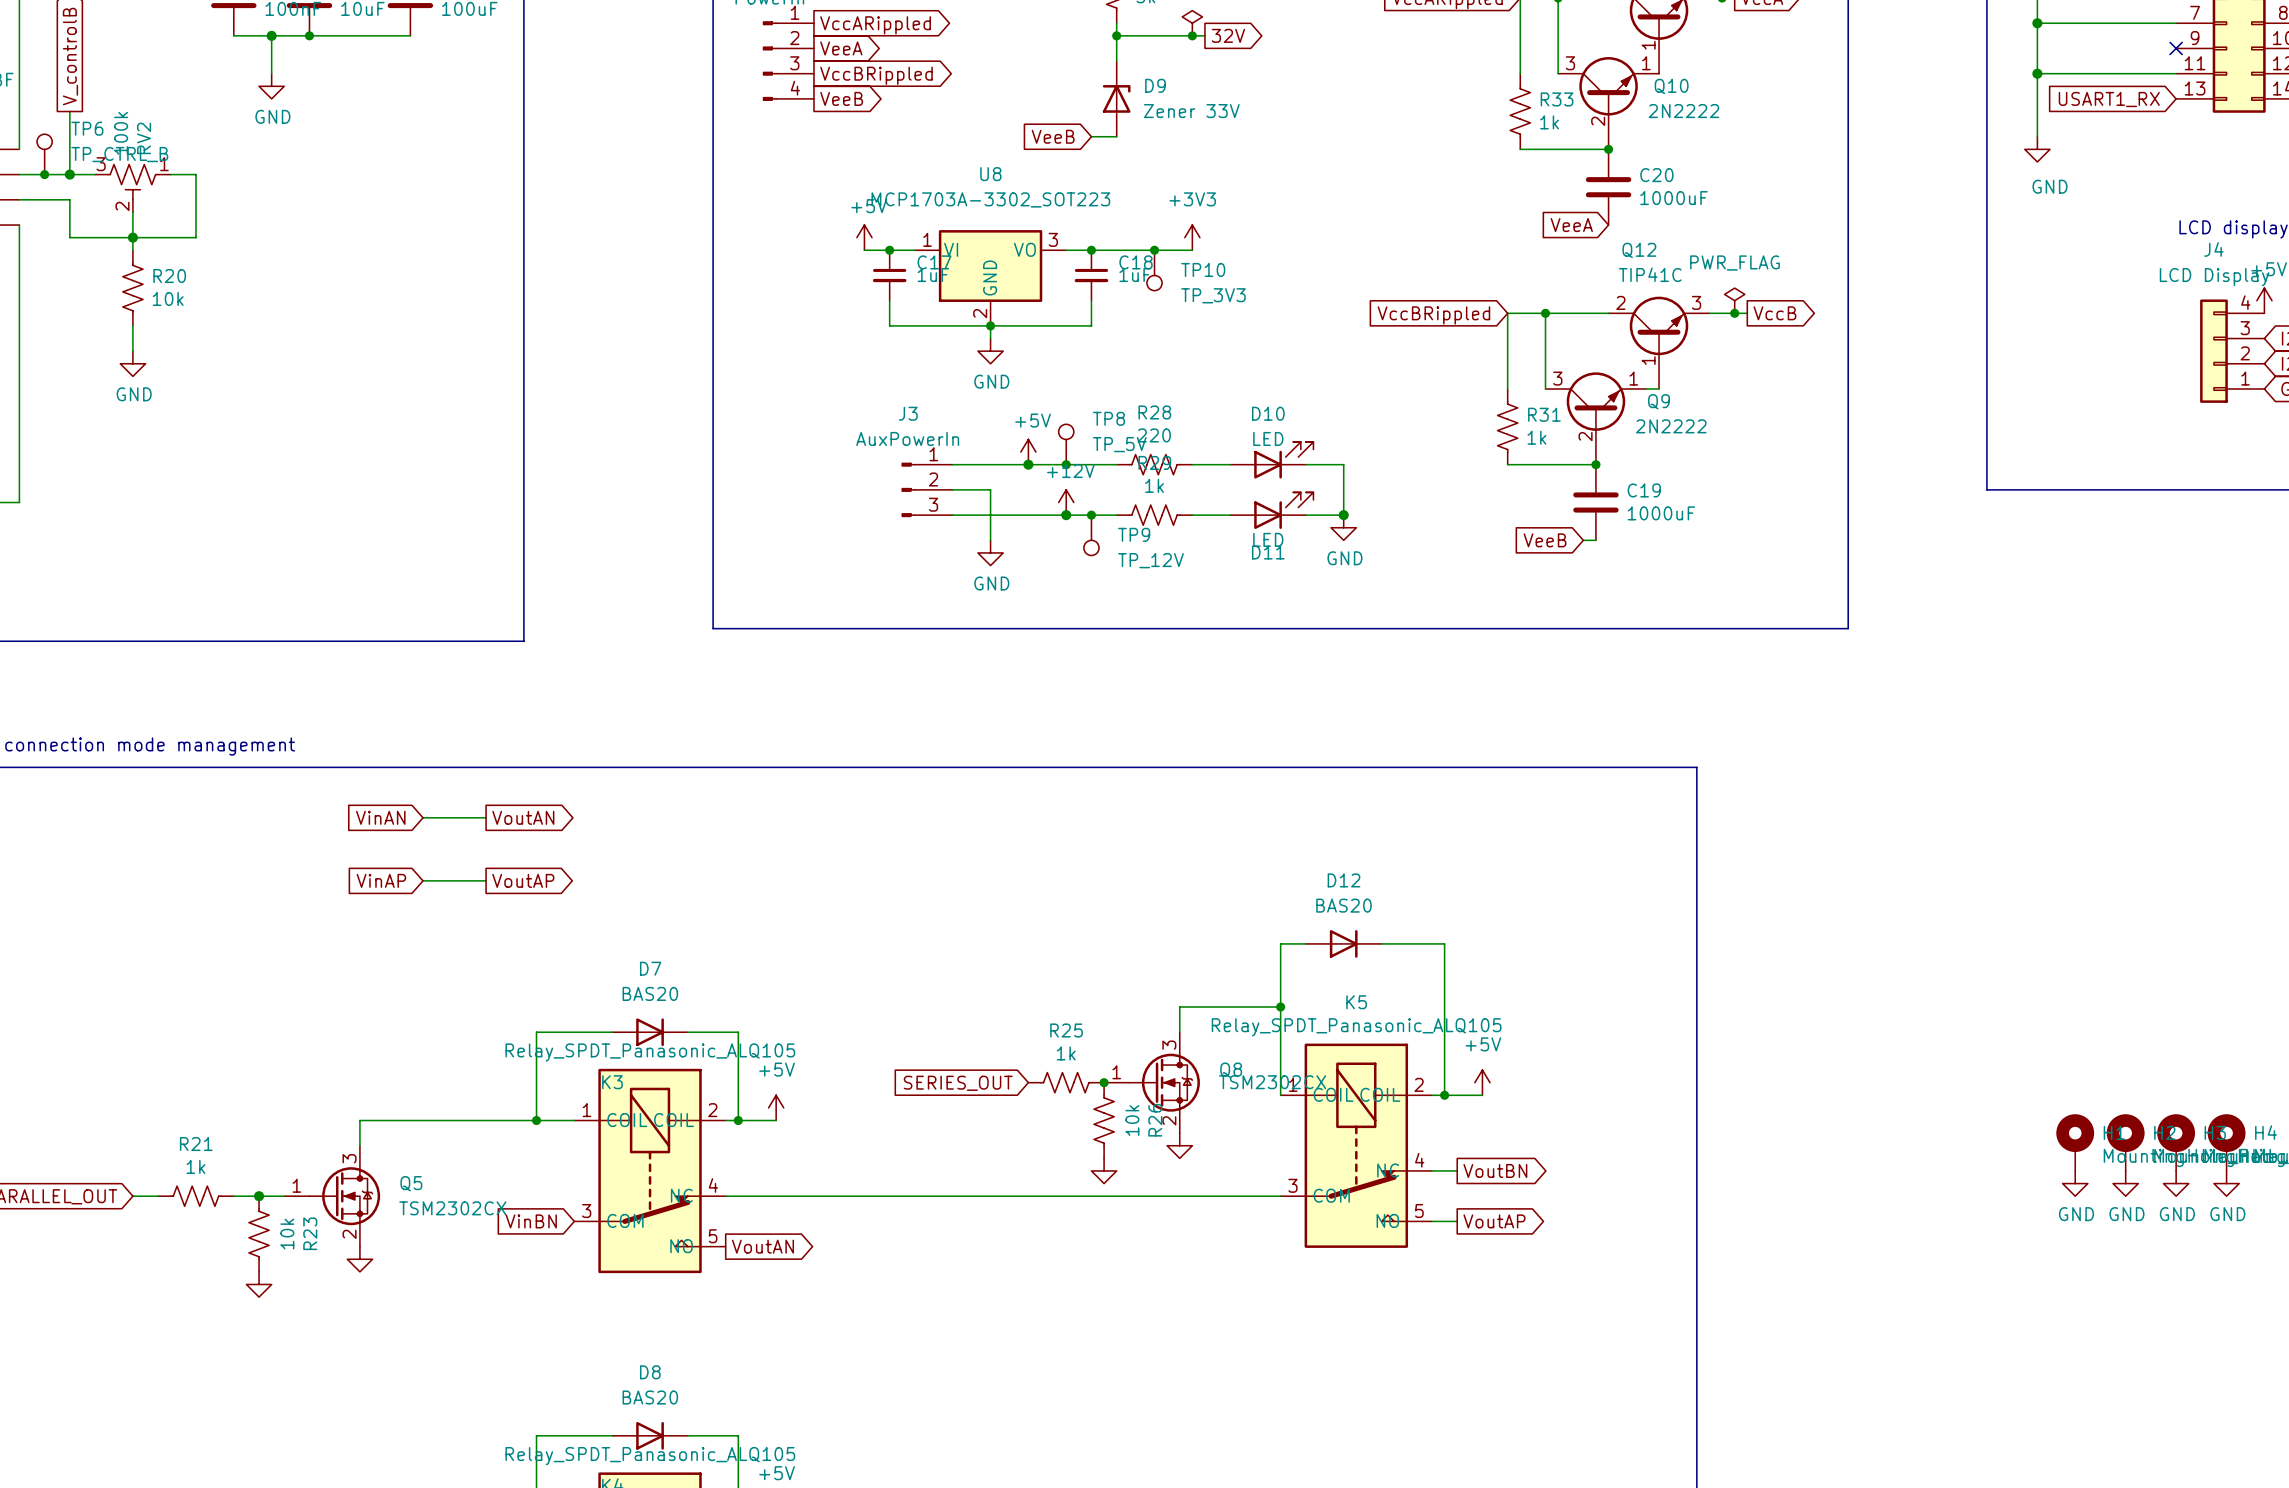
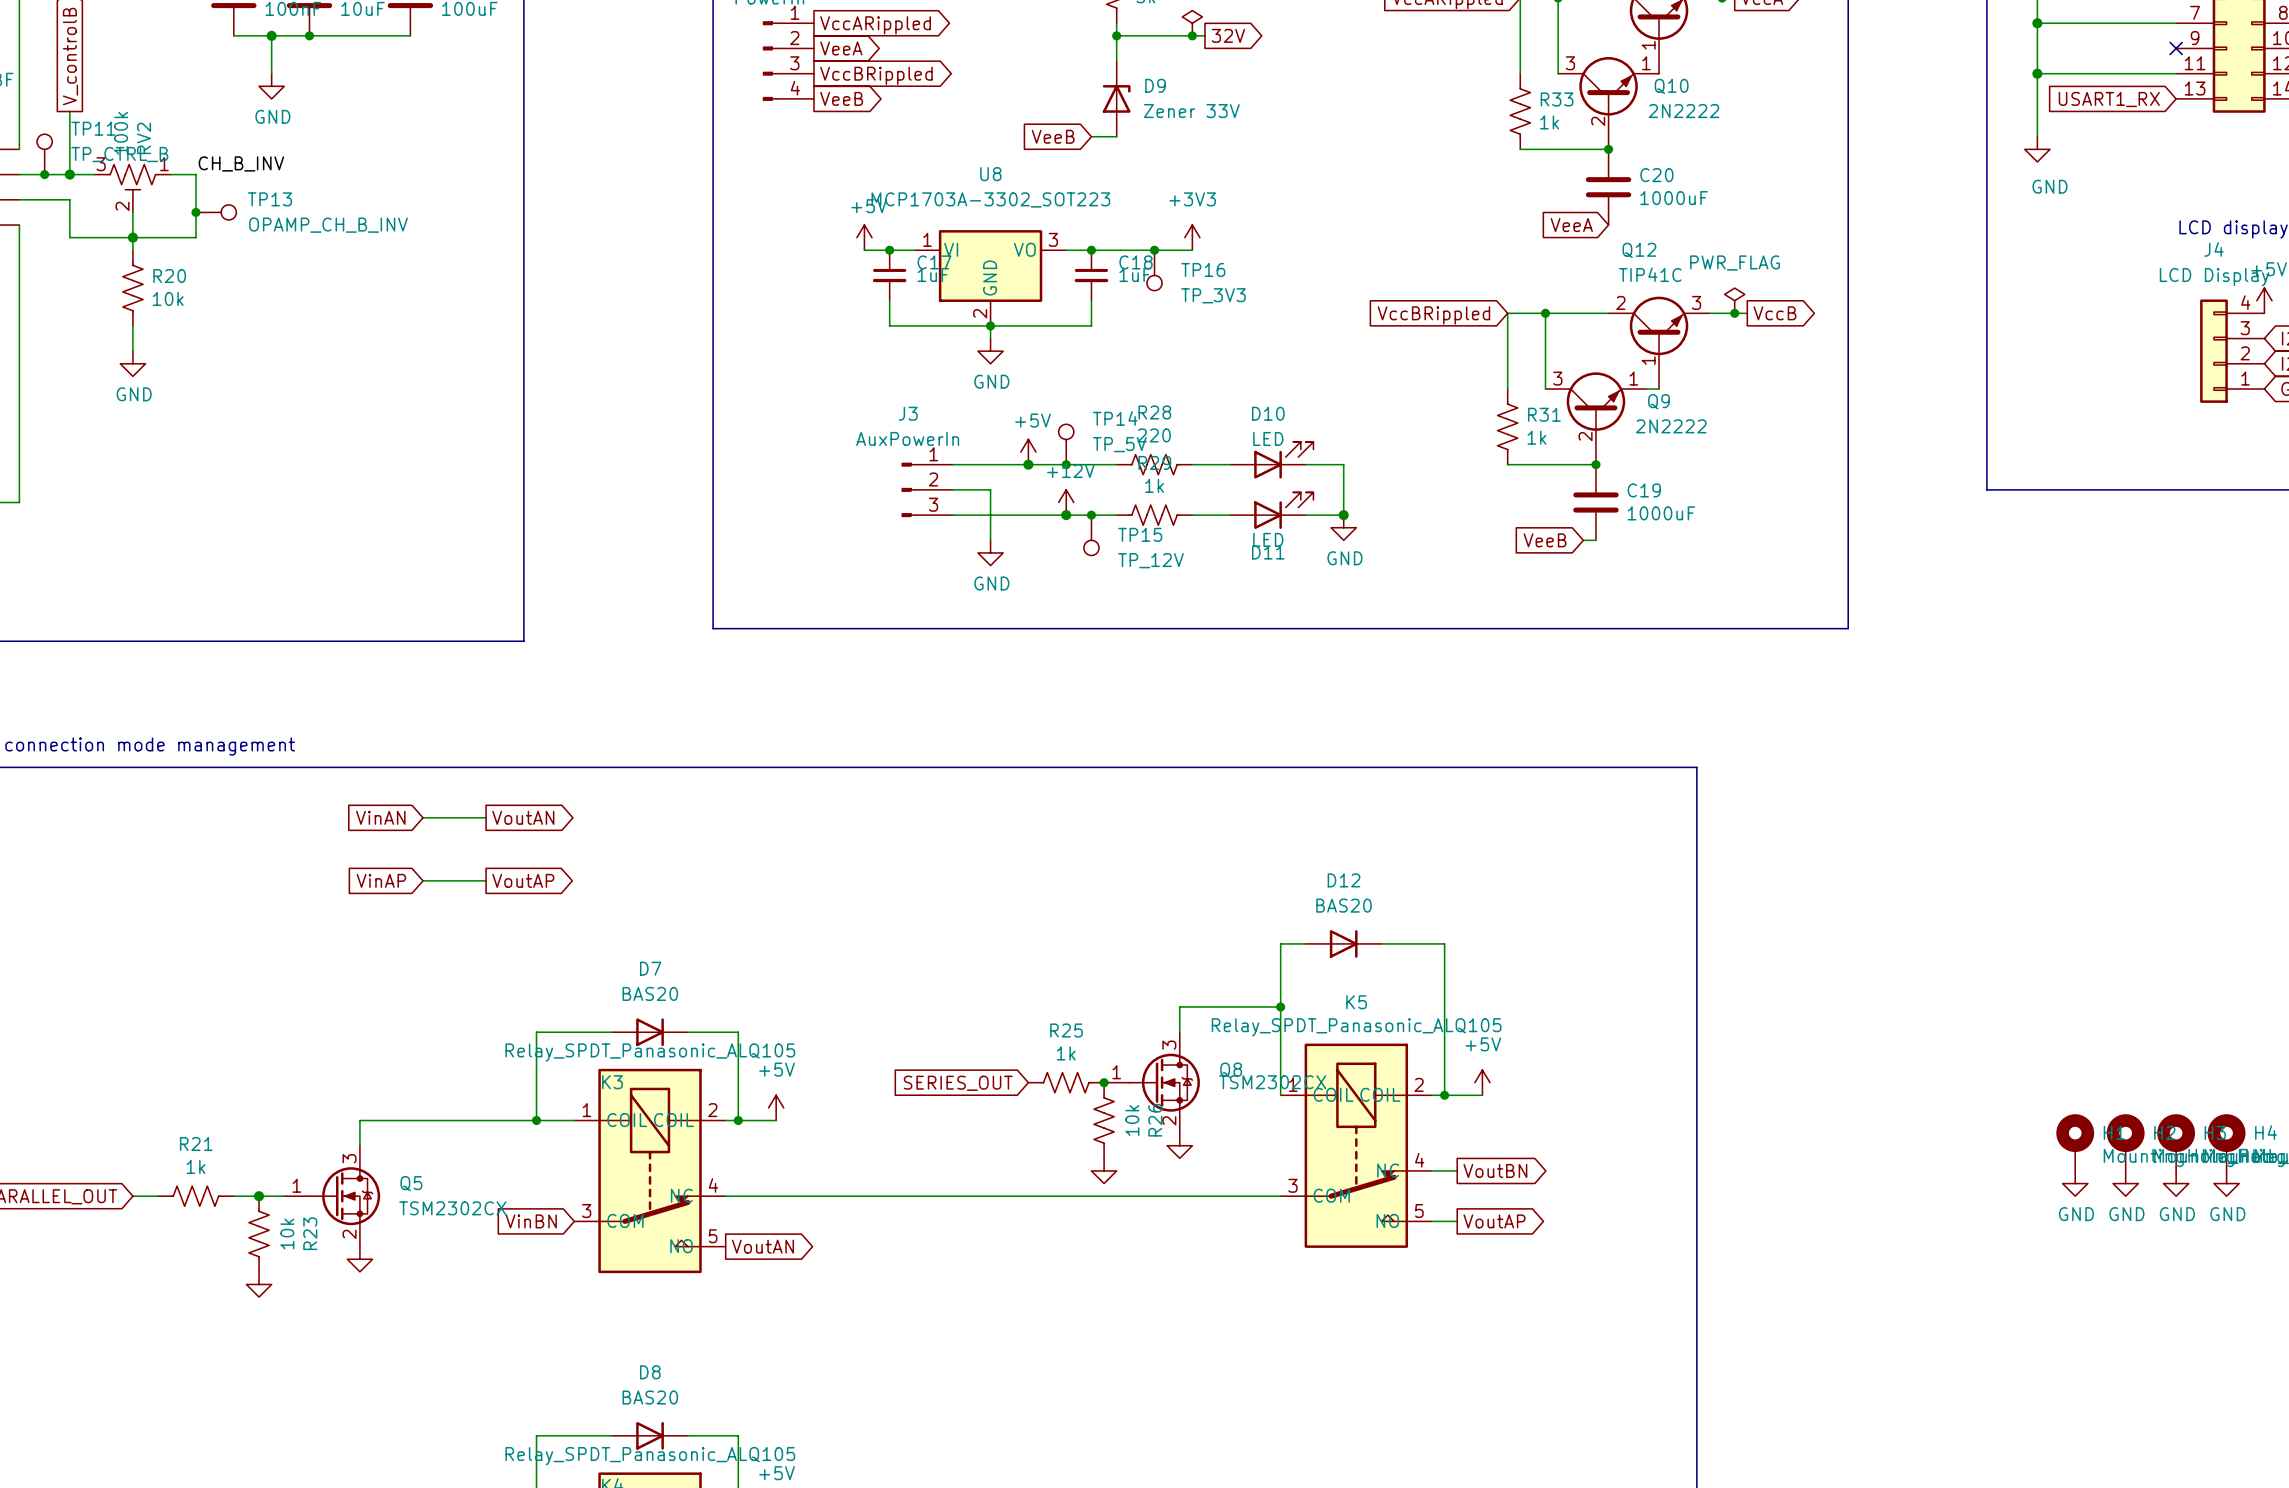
TP6 name: TP6 (87, 128) -> TP11 (93, 128)
label: none -> CH_B_INV (241, 163)
junction: none -> (195, 212)
TP13: none -> OPAMP_CH_B_INV (216, 212)
TP10 name: TP10 (1203, 269) -> TP16 (1203, 269)
TP8 name: TP8 (1108, 418) -> TP14 (1115, 418)
TP9 name: TP9 (1134, 534) -> TP15 (1140, 534)

